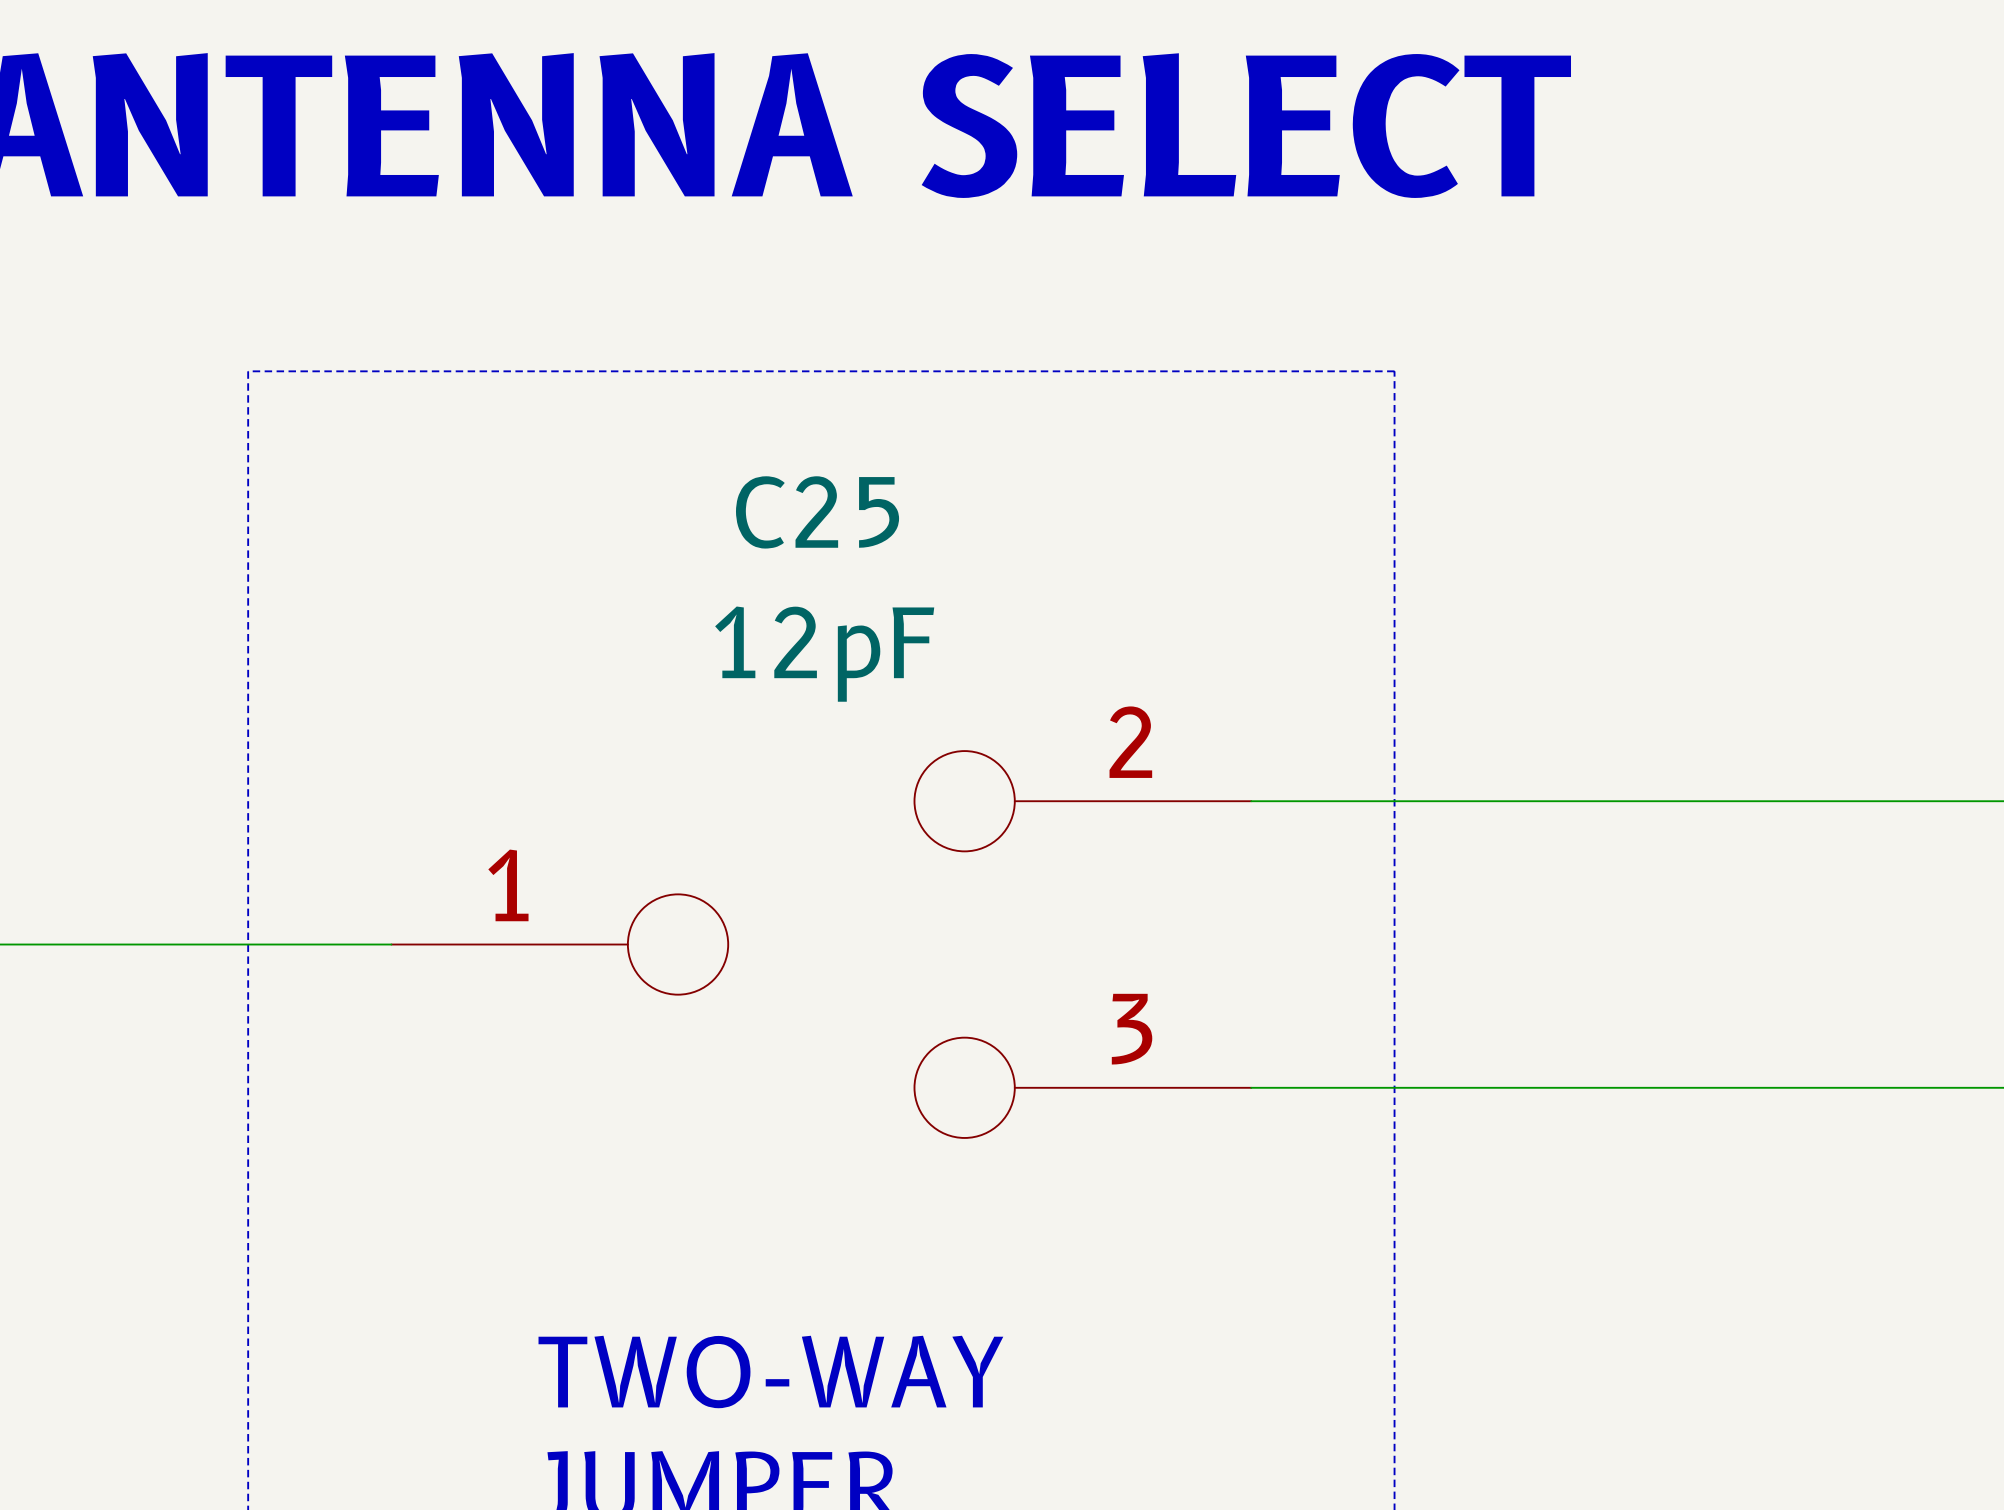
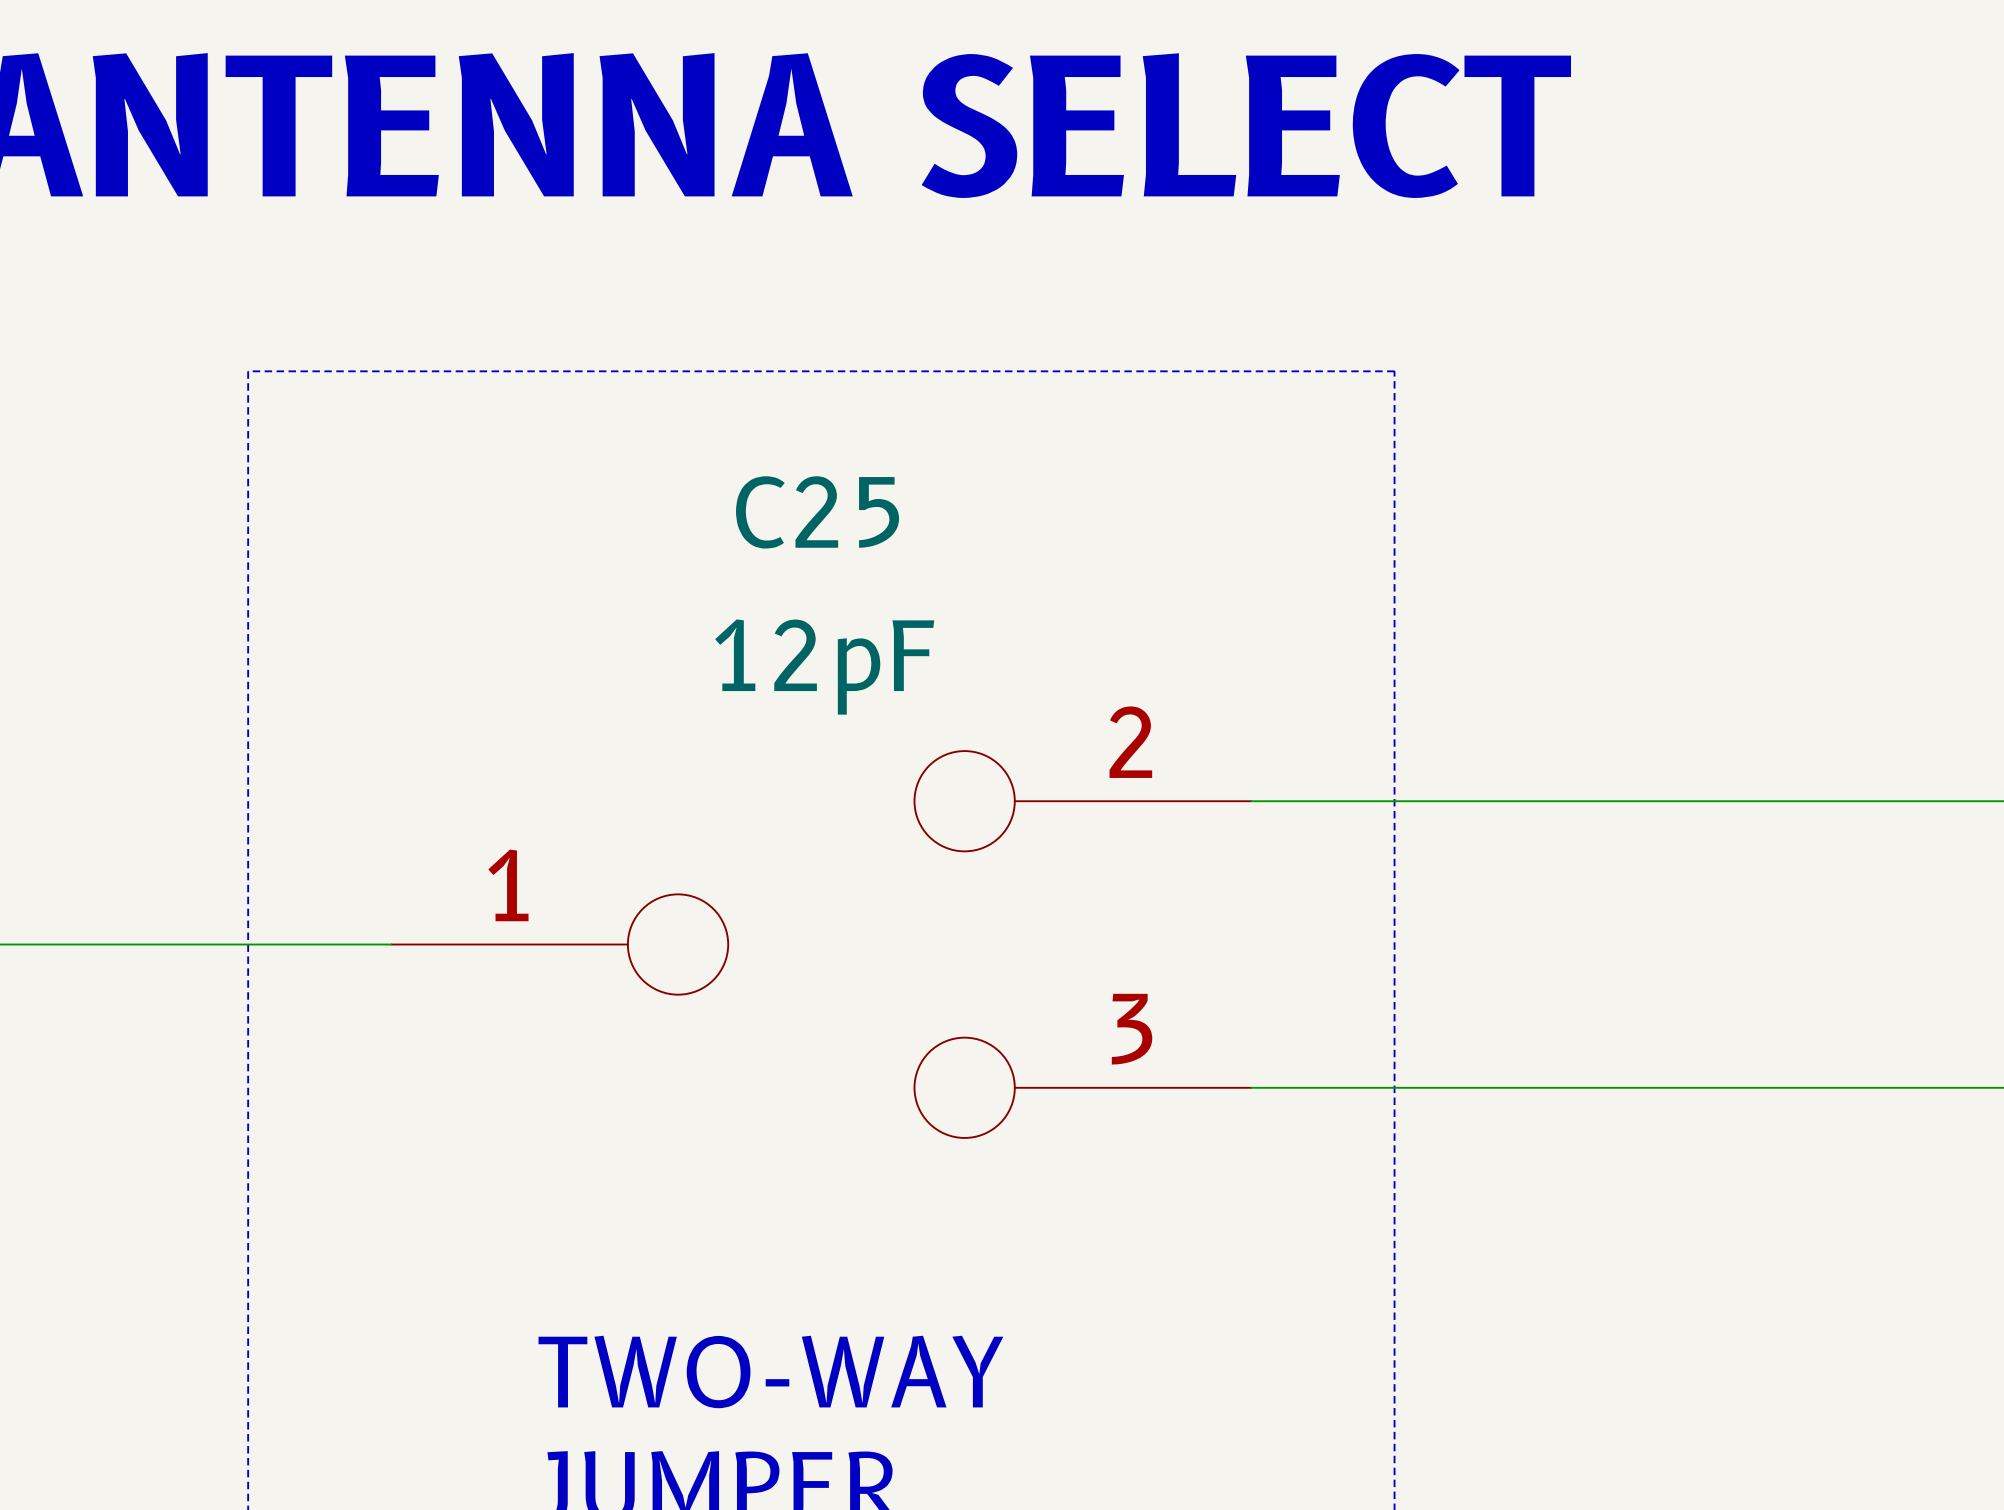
C25 value position: 12pF (824, 654) -> 12pF (824, 667)

